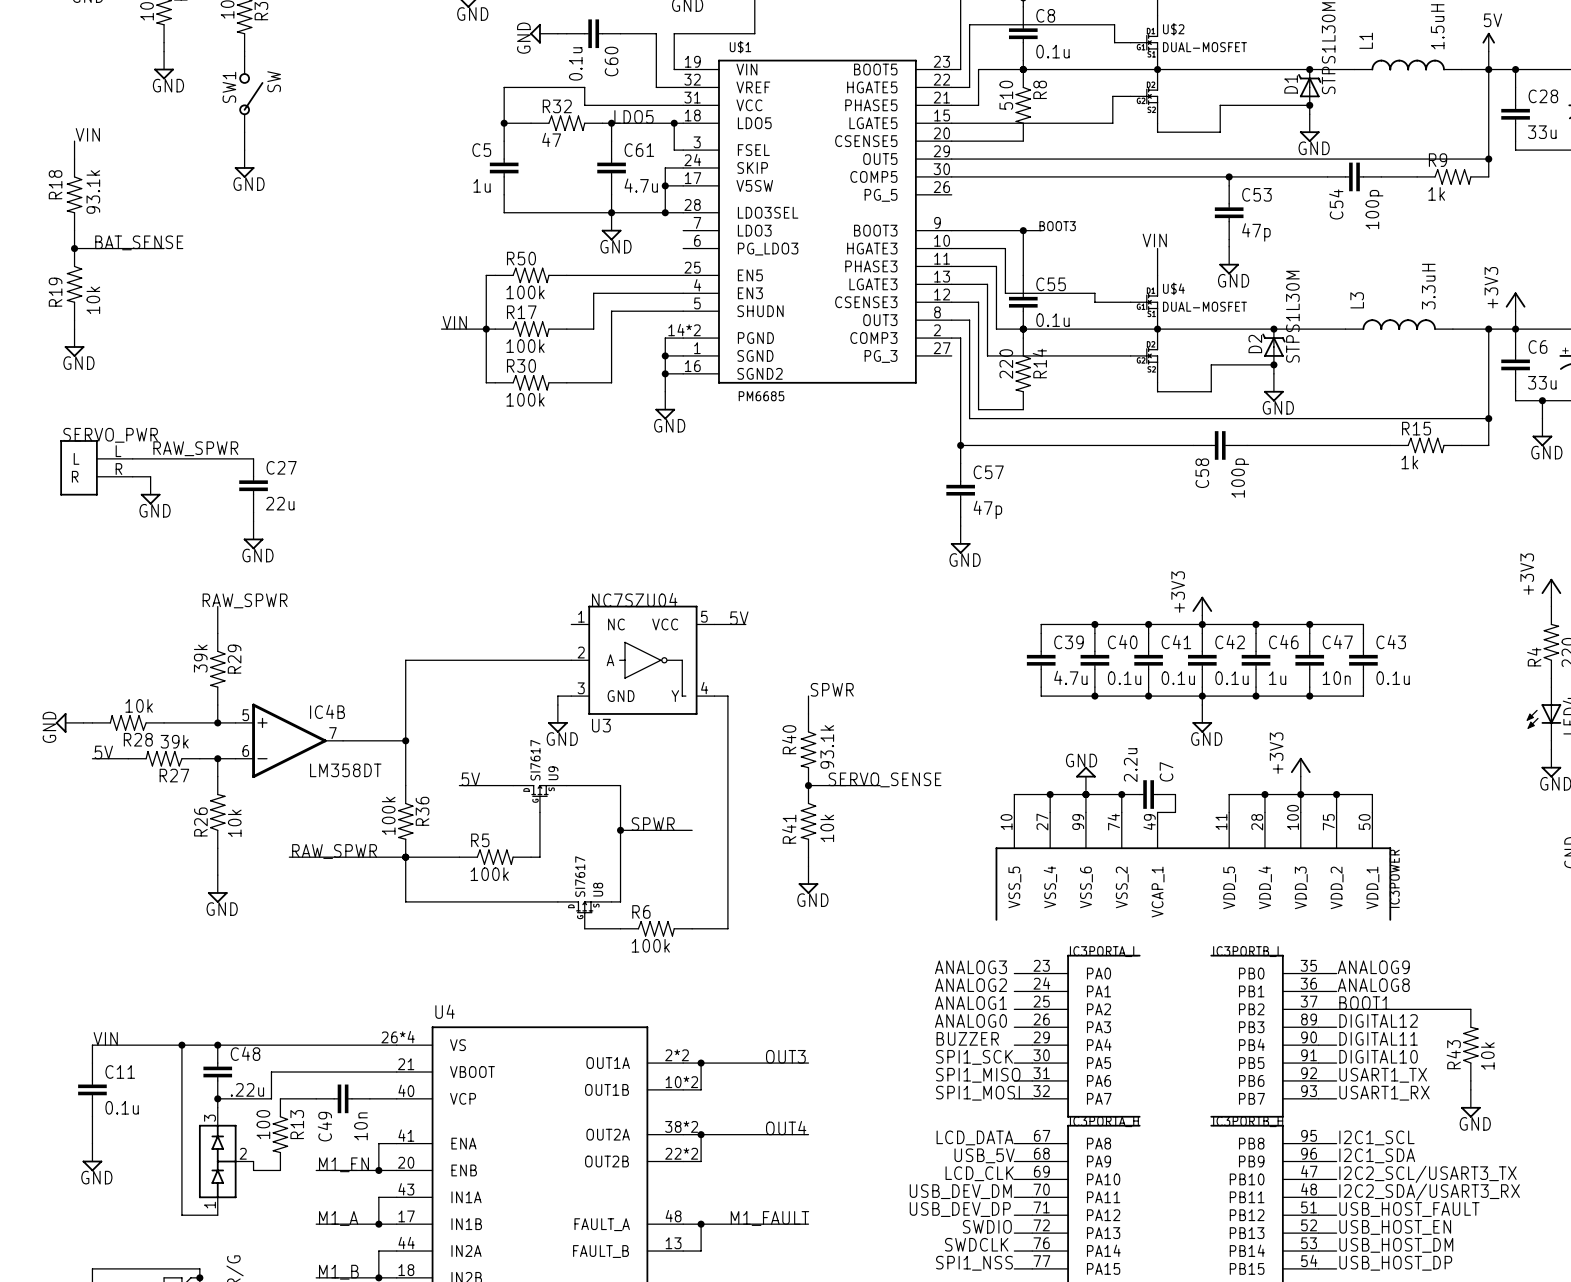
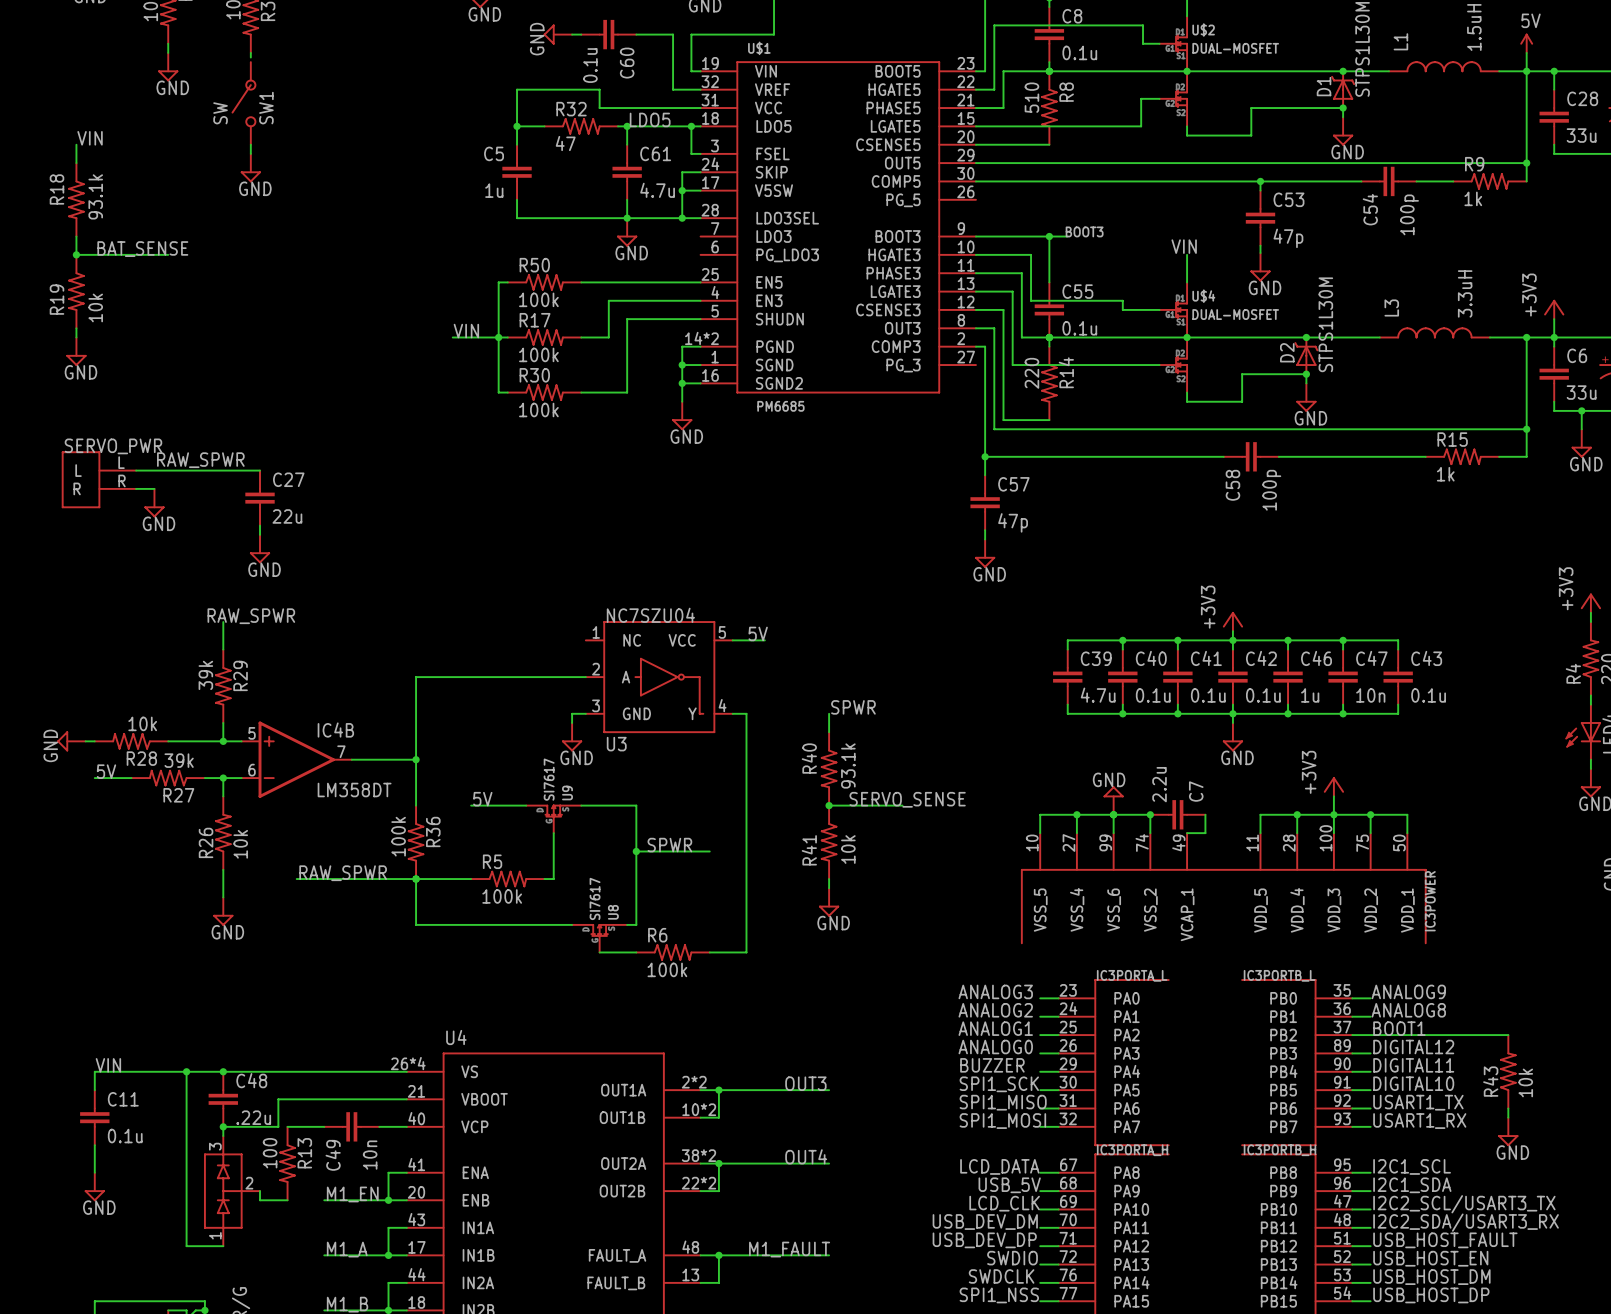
SW1 symbol: [239, 56, 264, 133] -> [231, 62, 257, 145]
SW1 value position: SW (274, 81) -> SW (220, 113)
SW1 name position: SW1 (229, 87) -> SW1 (266, 108)

